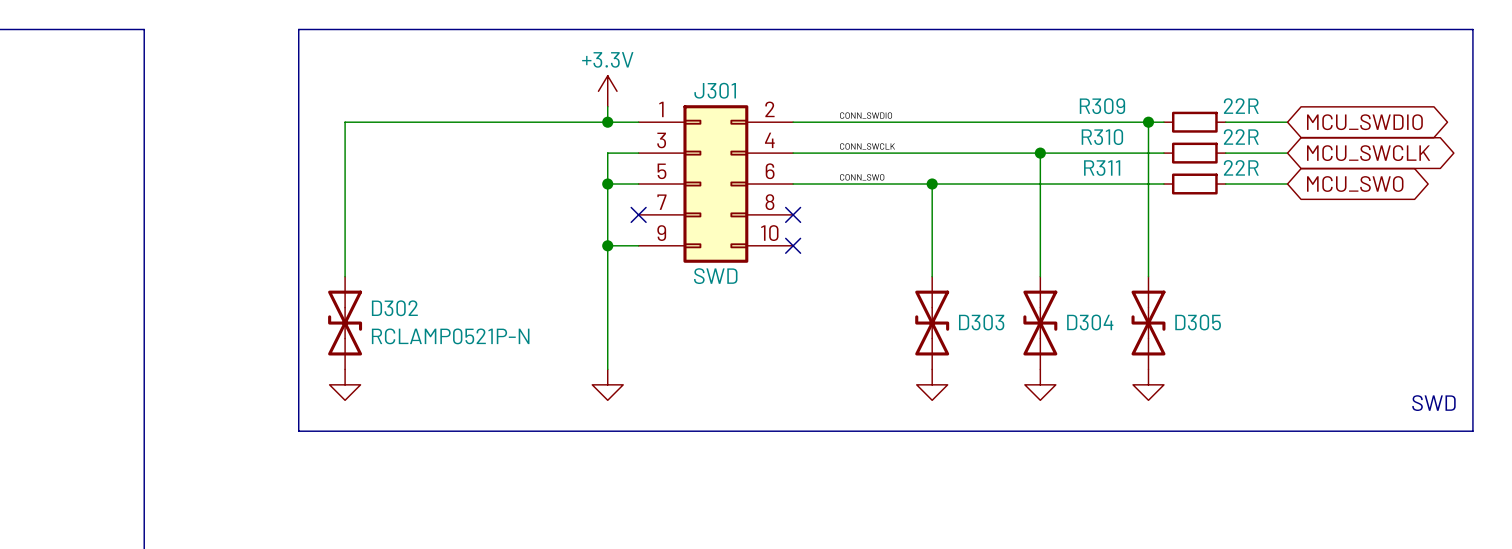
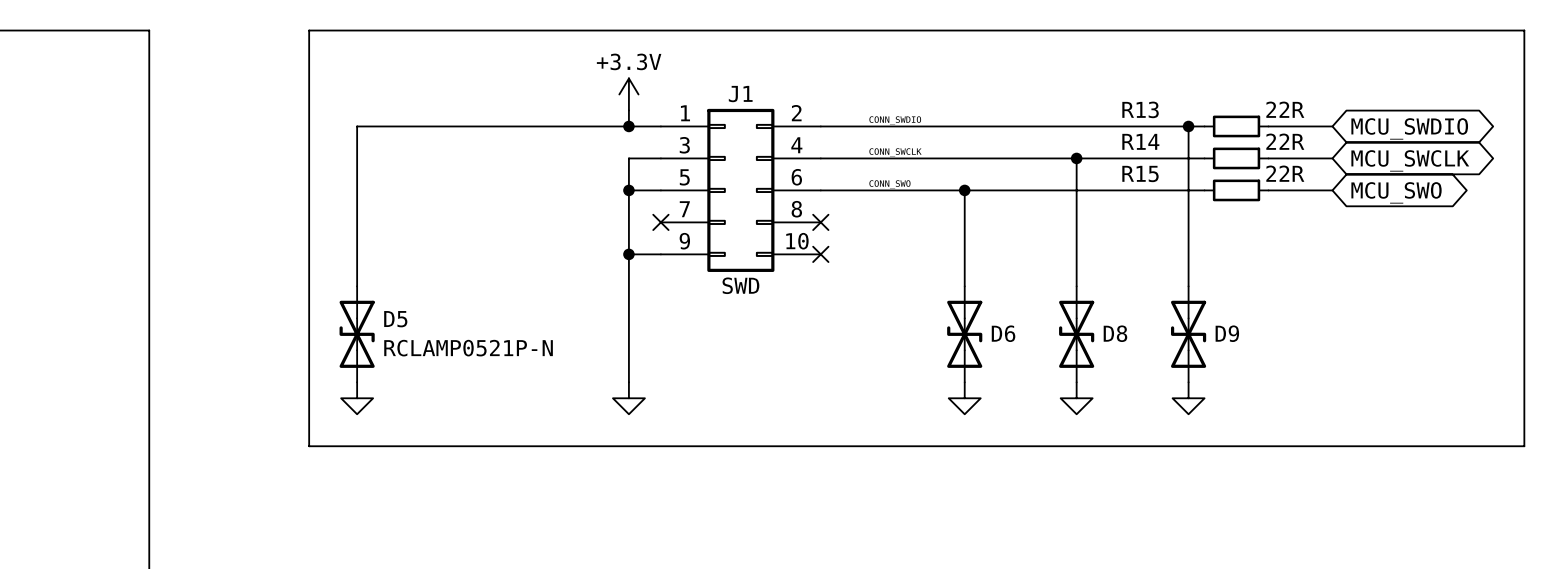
J301 name: J301 (715, 90) -> J1 (740, 94)
R309 name: R309 (1102, 106) -> R13 (1140, 109)
R310 name: R310 (1102, 137) -> R14 (1140, 141)
R311 name: R311 (1102, 168) -> R15 (1140, 173)
D302 name: D302 (394, 308) -> D5 (395, 319)
D303 name: D303 (981, 322) -> D6 (1003, 333)
D304 name: D304 (1090, 322) -> D8 (1115, 333)
D305 name: D305 (1198, 322) -> D9 (1227, 333)
text: SWD (1433, 403) -> none

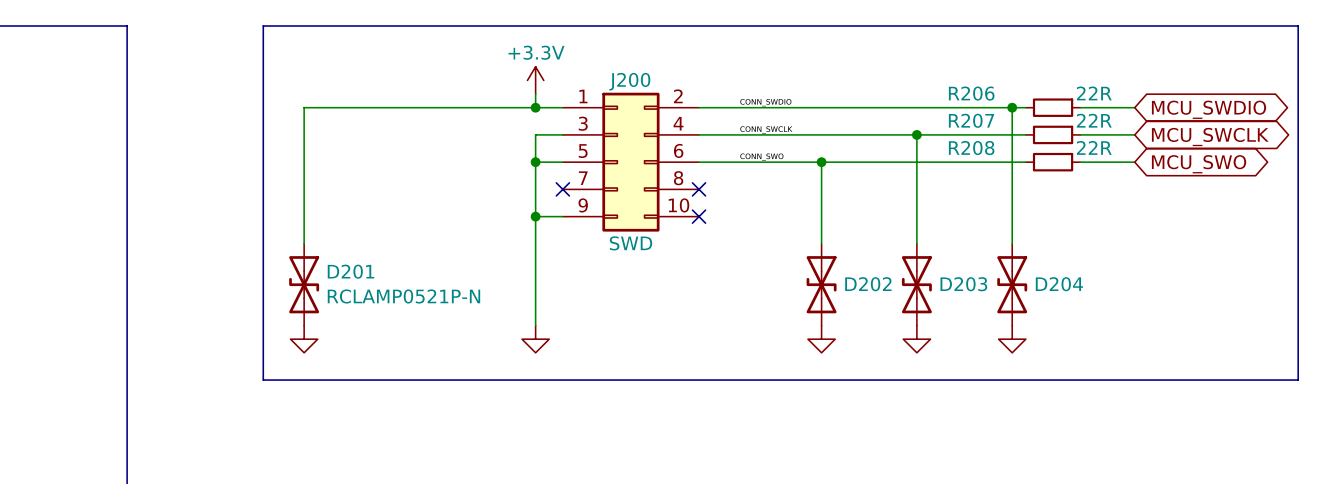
J1 name: J1 (740, 94) -> J200 (629, 81)
R13 name: R13 (1140, 109) -> R206 (971, 93)
R14 name: R14 (1140, 141) -> R207 (971, 120)
R15 name: R15 (1140, 173) -> R208 (971, 148)
D5 name: D5 (395, 319) -> D201 (350, 271)
D6 name: D6 (1003, 333) -> D202 (868, 284)
D8 name: D8 (1115, 333) -> D203 (963, 284)
D9 name: D9 (1227, 333) -> D204 (1059, 284)

